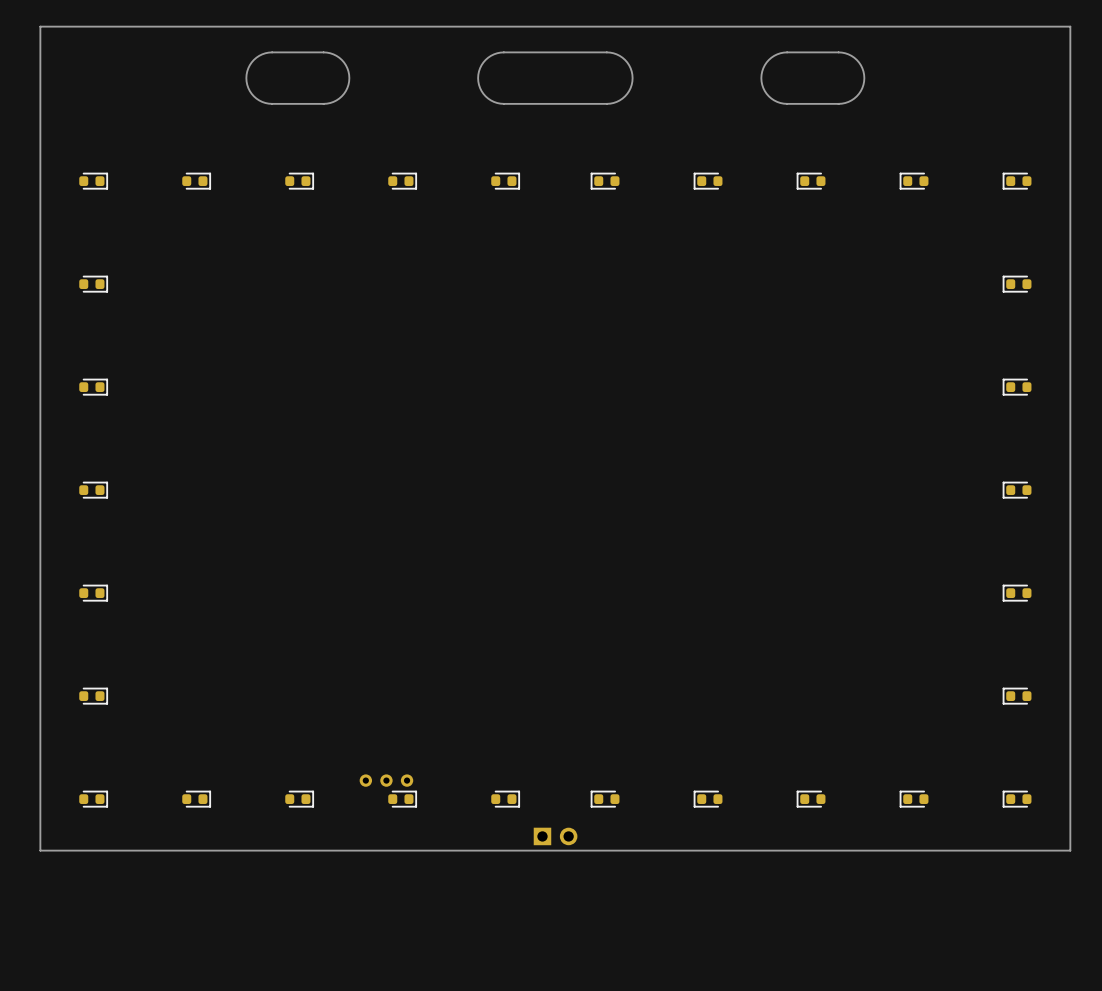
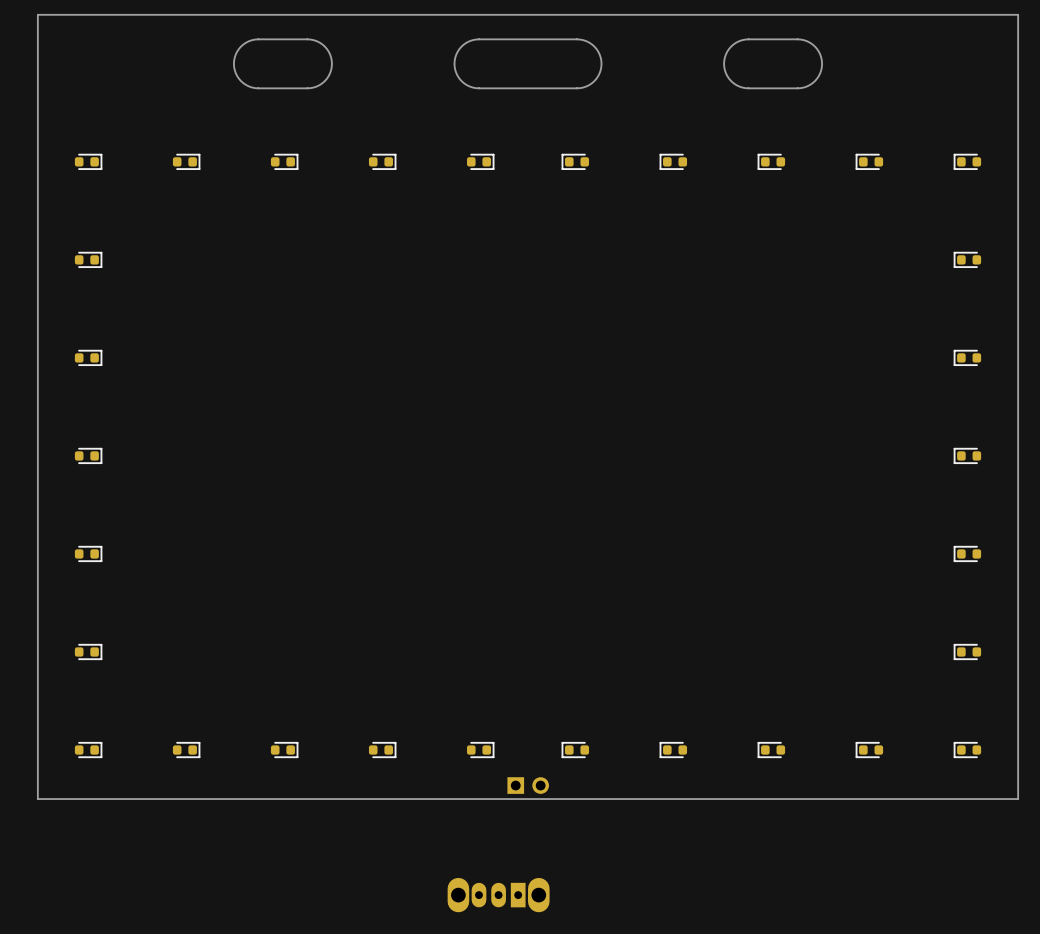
part: (386, 780) -> none
part: none -> (498, 895)

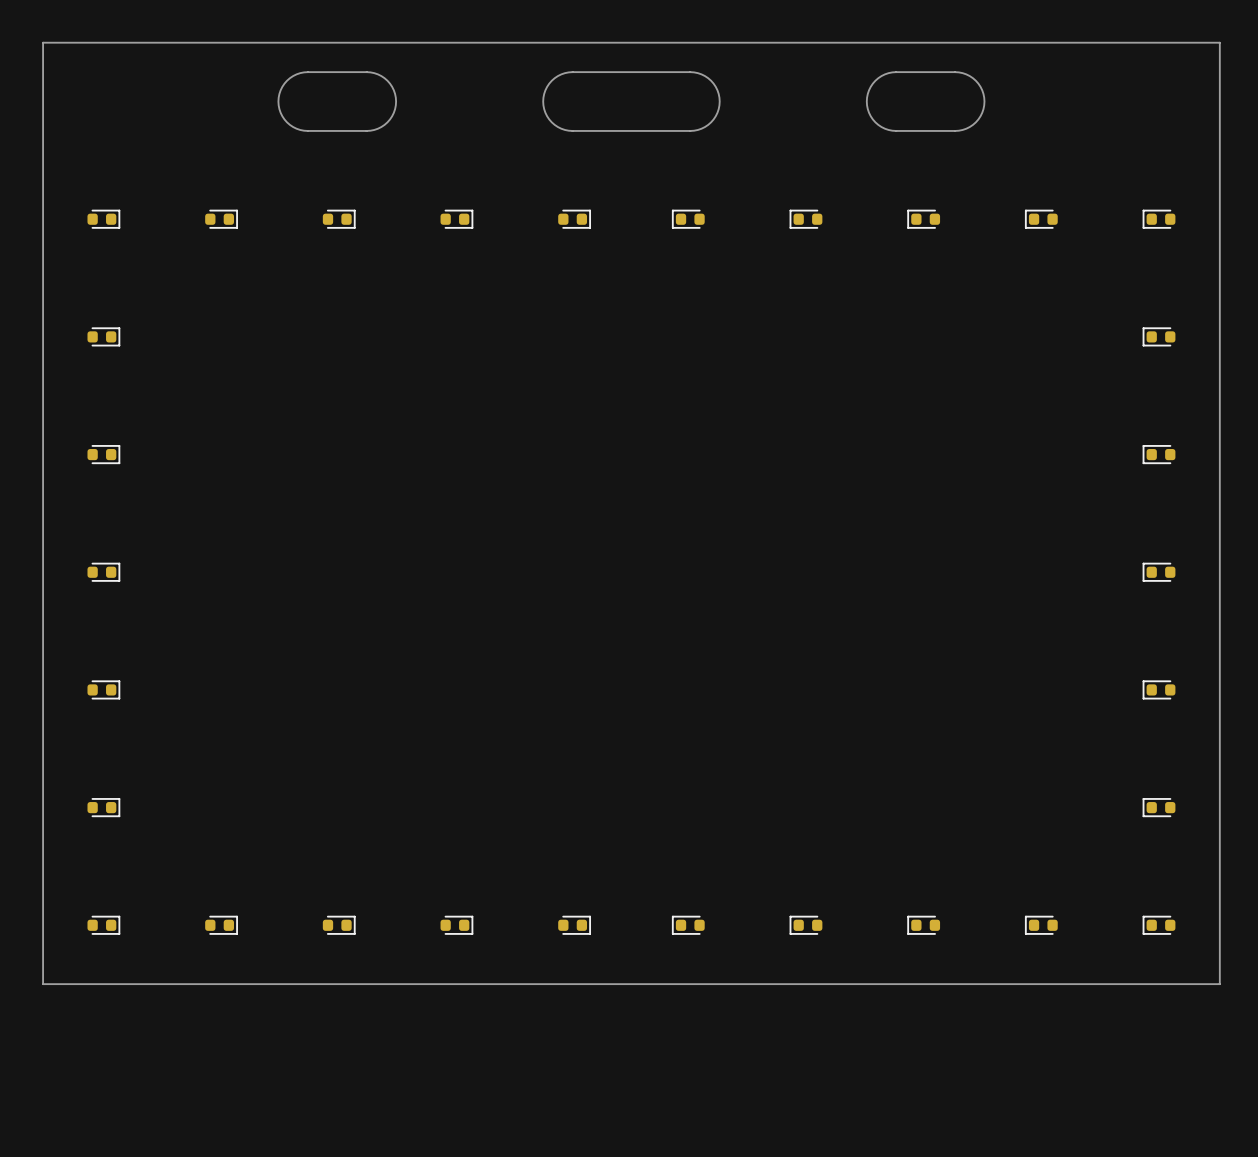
part: (528, 785) -> none
part: (498, 895) -> none

